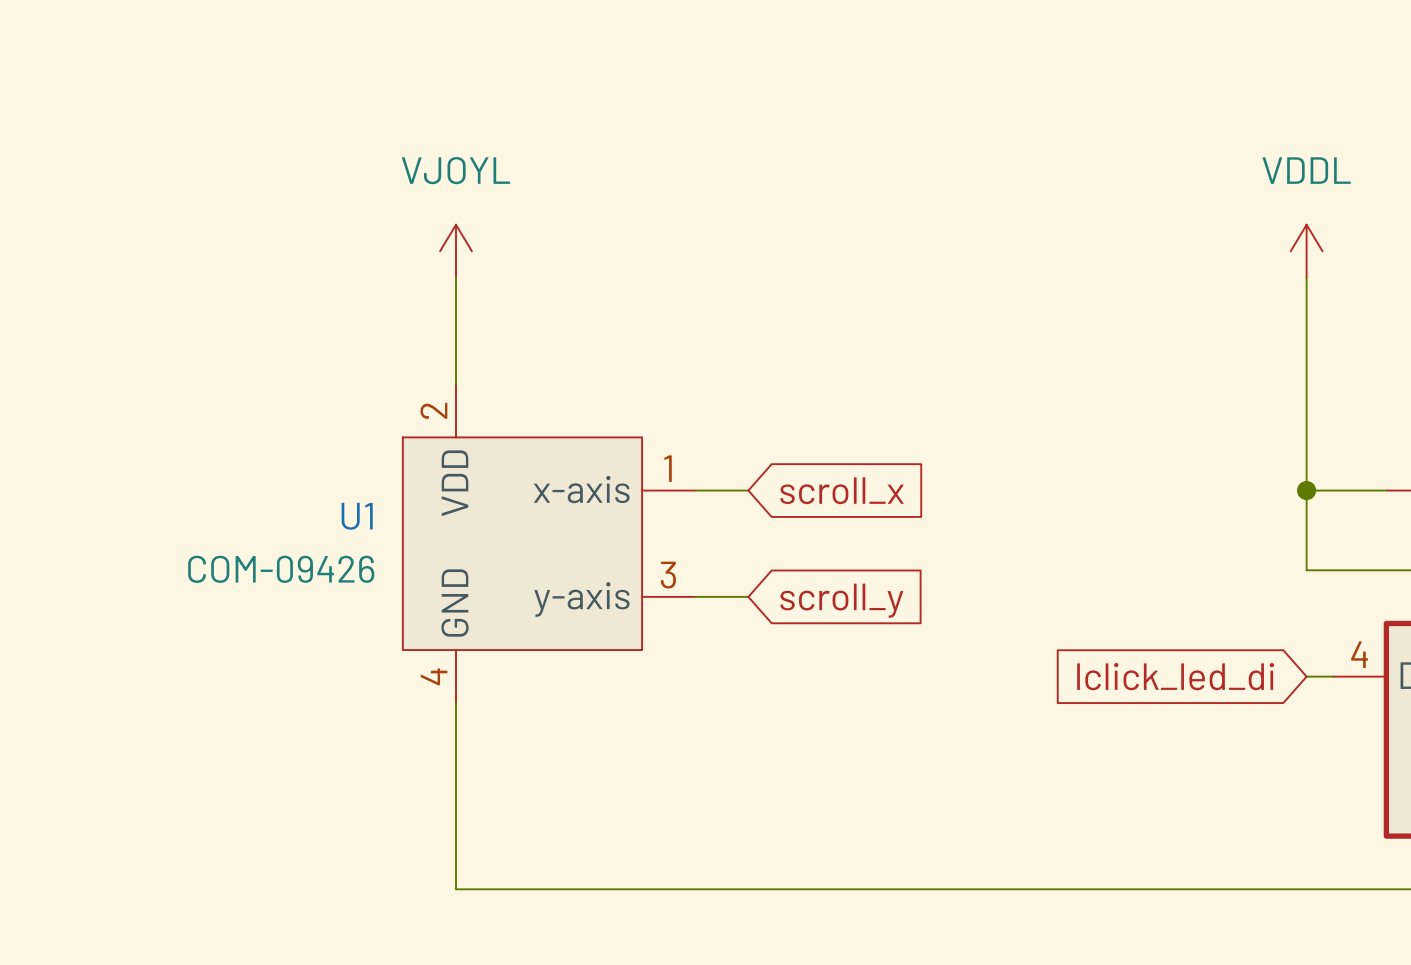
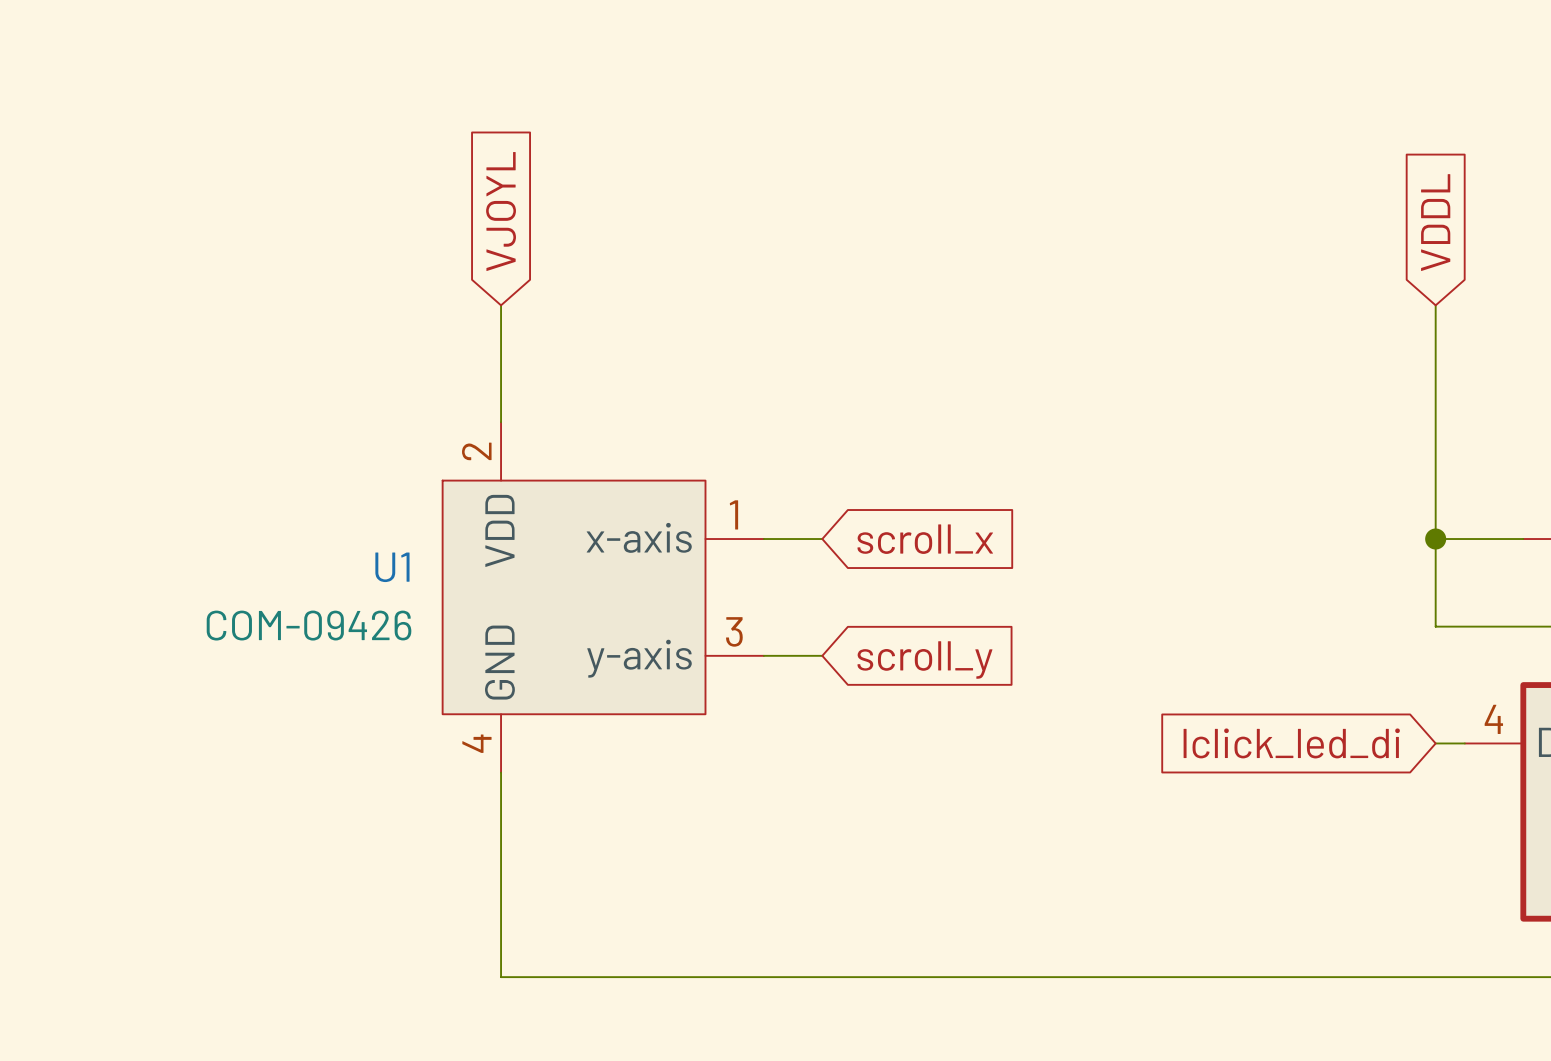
global label: none -> VJOYL (501, 211)
global label: none -> VDDL (1435, 222)
power symbol: VJOYL (456, 251) -> none
power symbol: VDDL (1306, 251) -> none

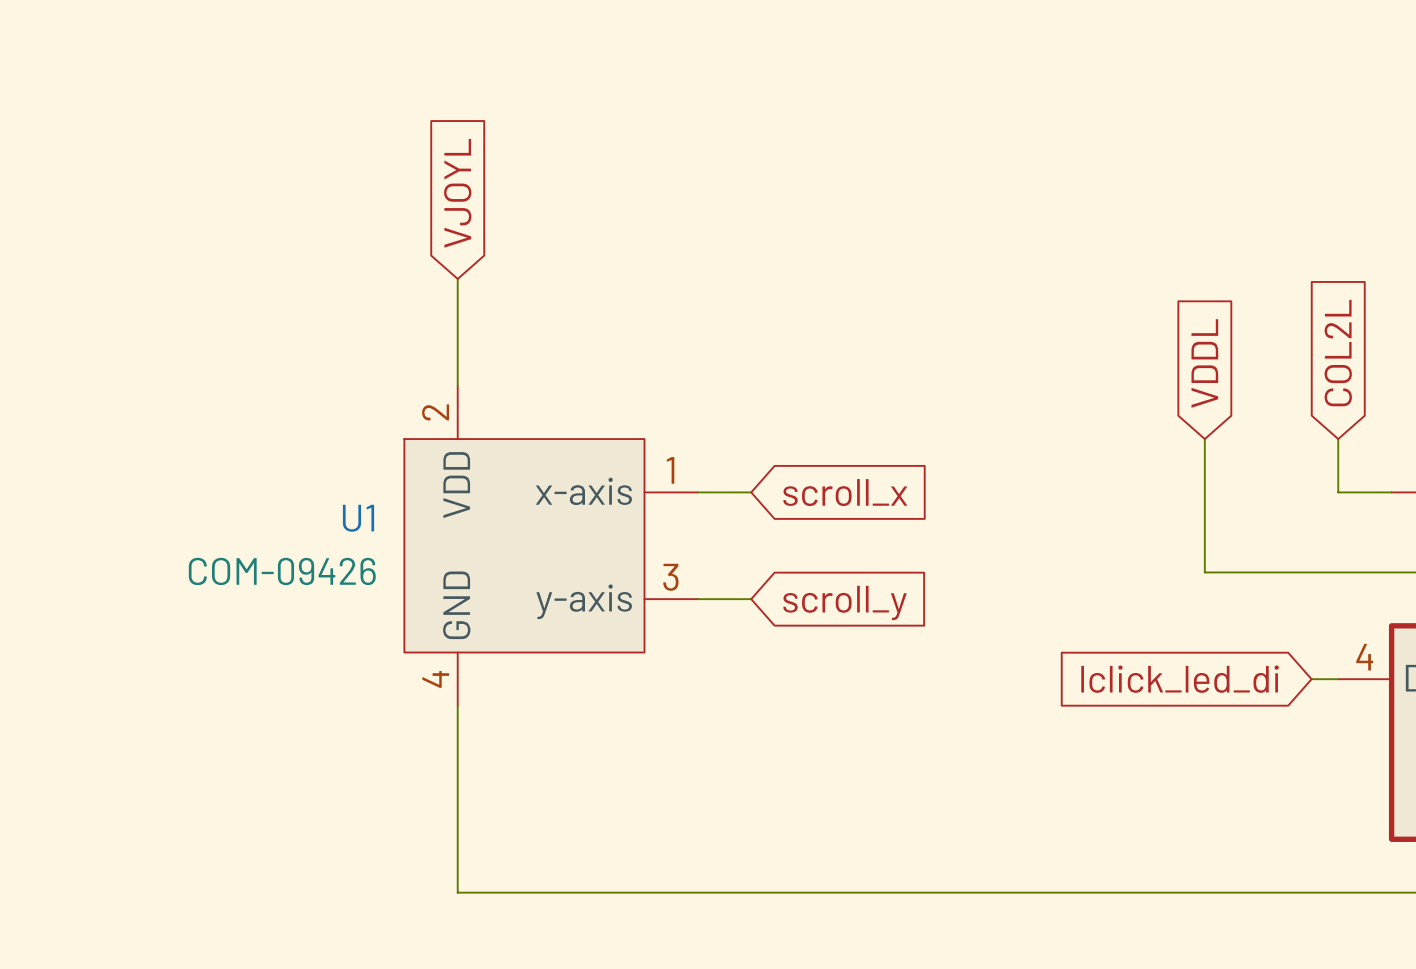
global label position: VDDL (1435, 222) -> VDDL (1204, 363)
wire: (1435, 305) (1435, 626) -> (1204, 439) (1204, 572) (1311, 572)
global label: none -> COL2L (1338, 353)
wire: (1435, 539) (1464, 539) -> (1338, 439) (1338, 492)
junction: (1435, 539) -> none

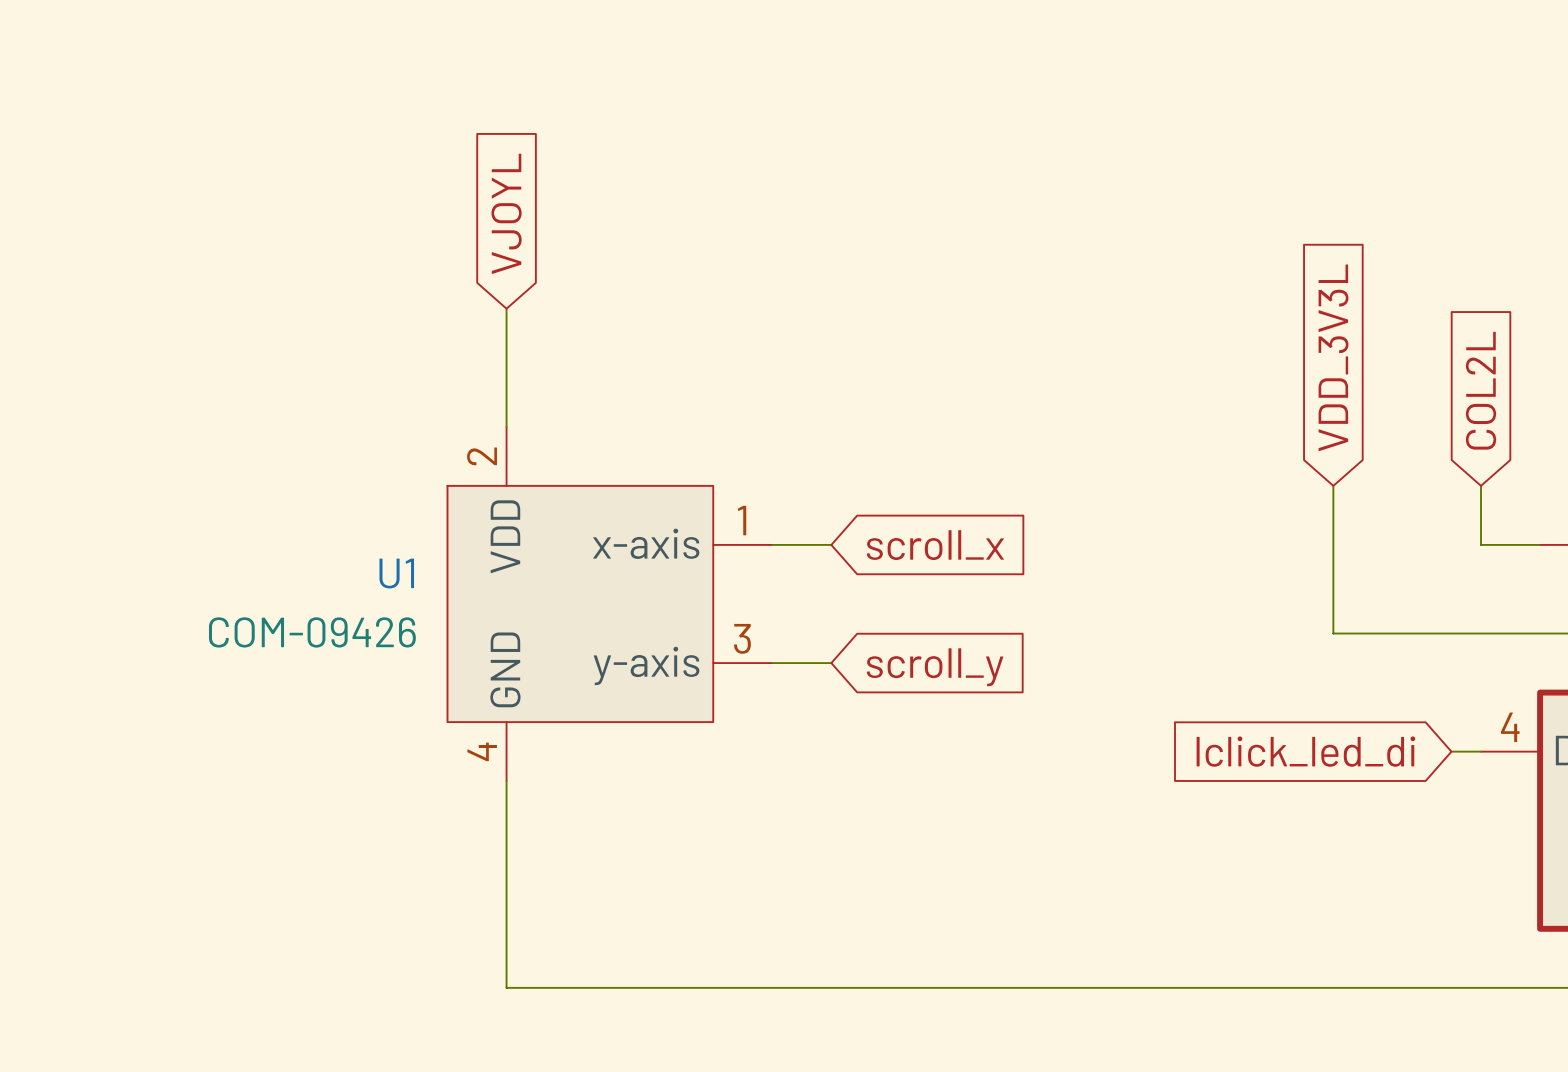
global label: VDDL (1204, 363) -> VDD_3V3L (1333, 357)

